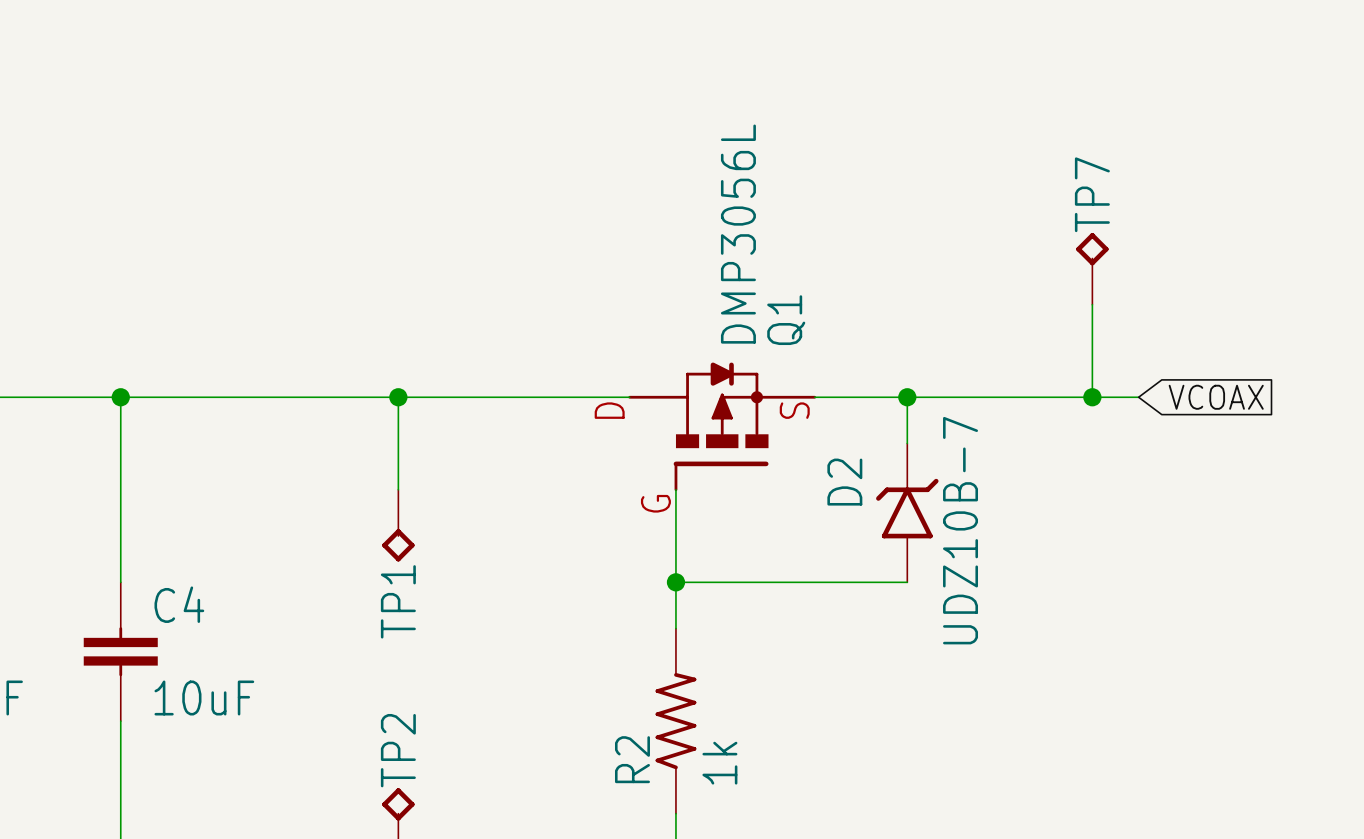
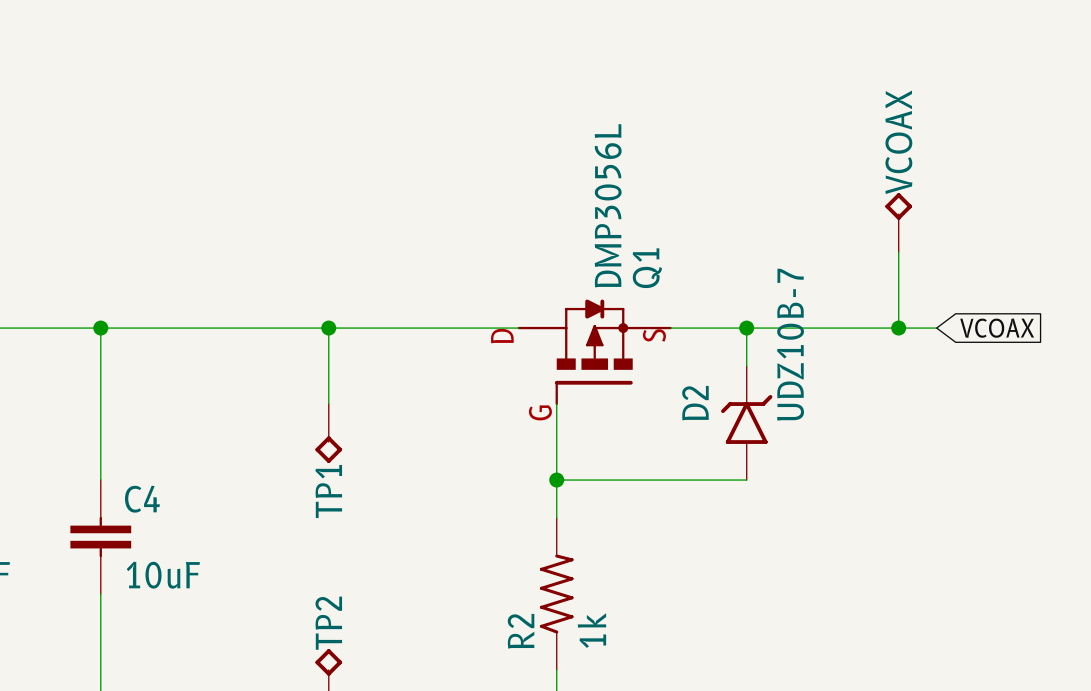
TP7 name: TP7 (1092, 194) -> VCOAX (898, 142)
D2 value position: UDZ10B-7 (960, 530) -> UDZ10B-7 (790, 344)

